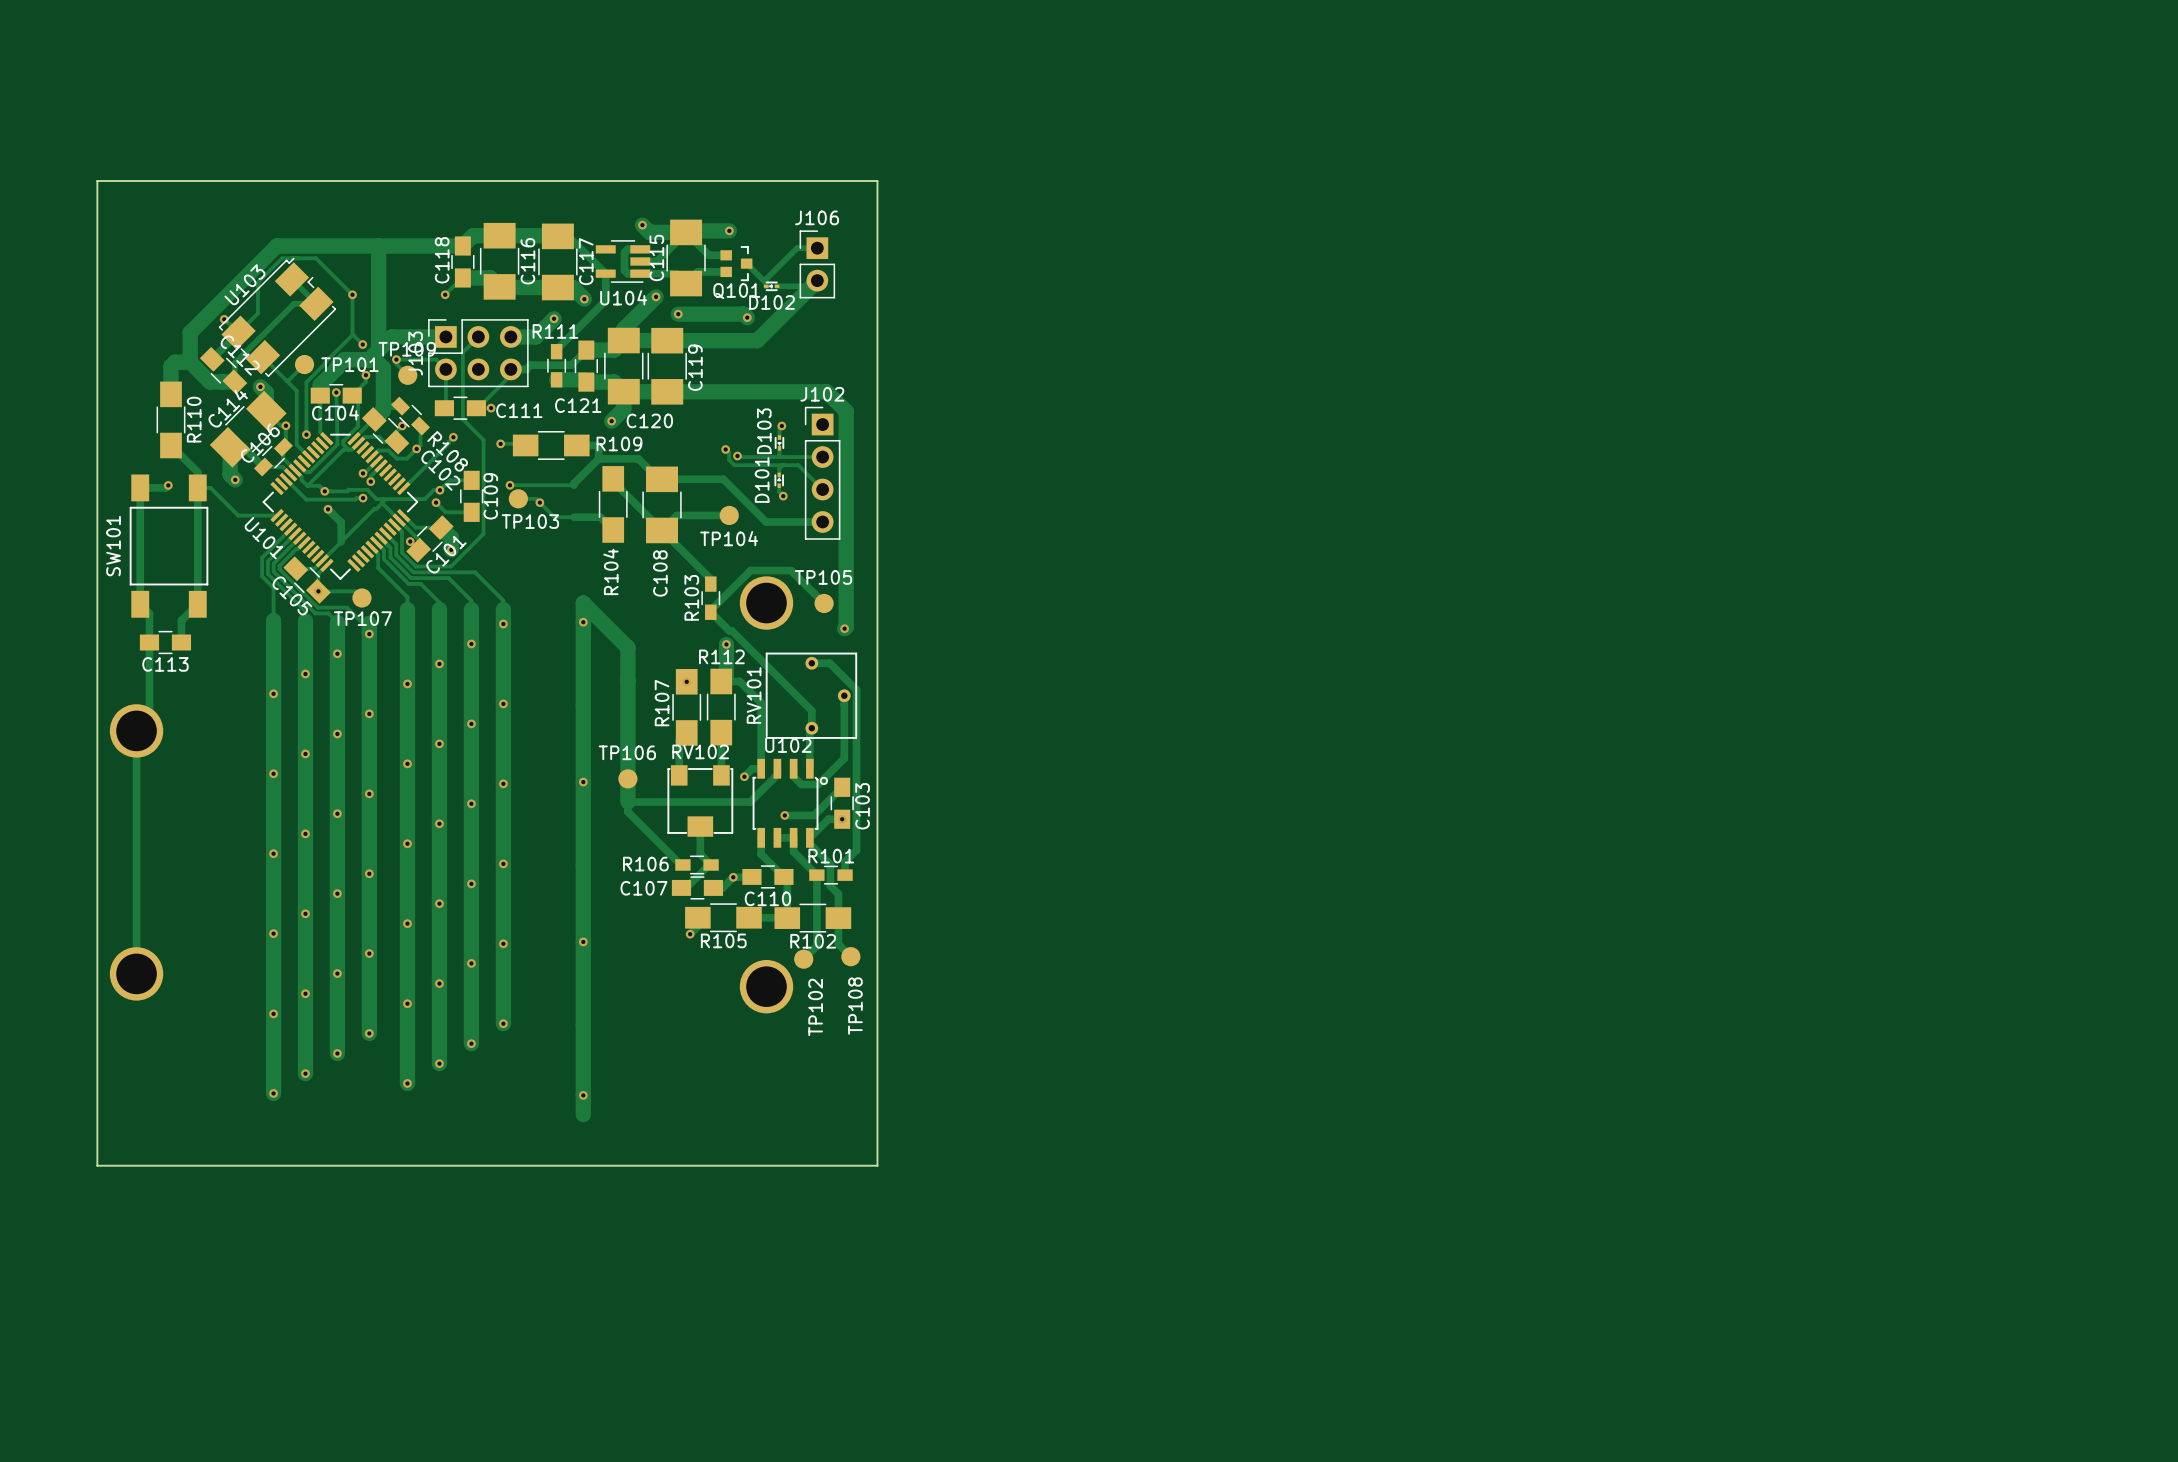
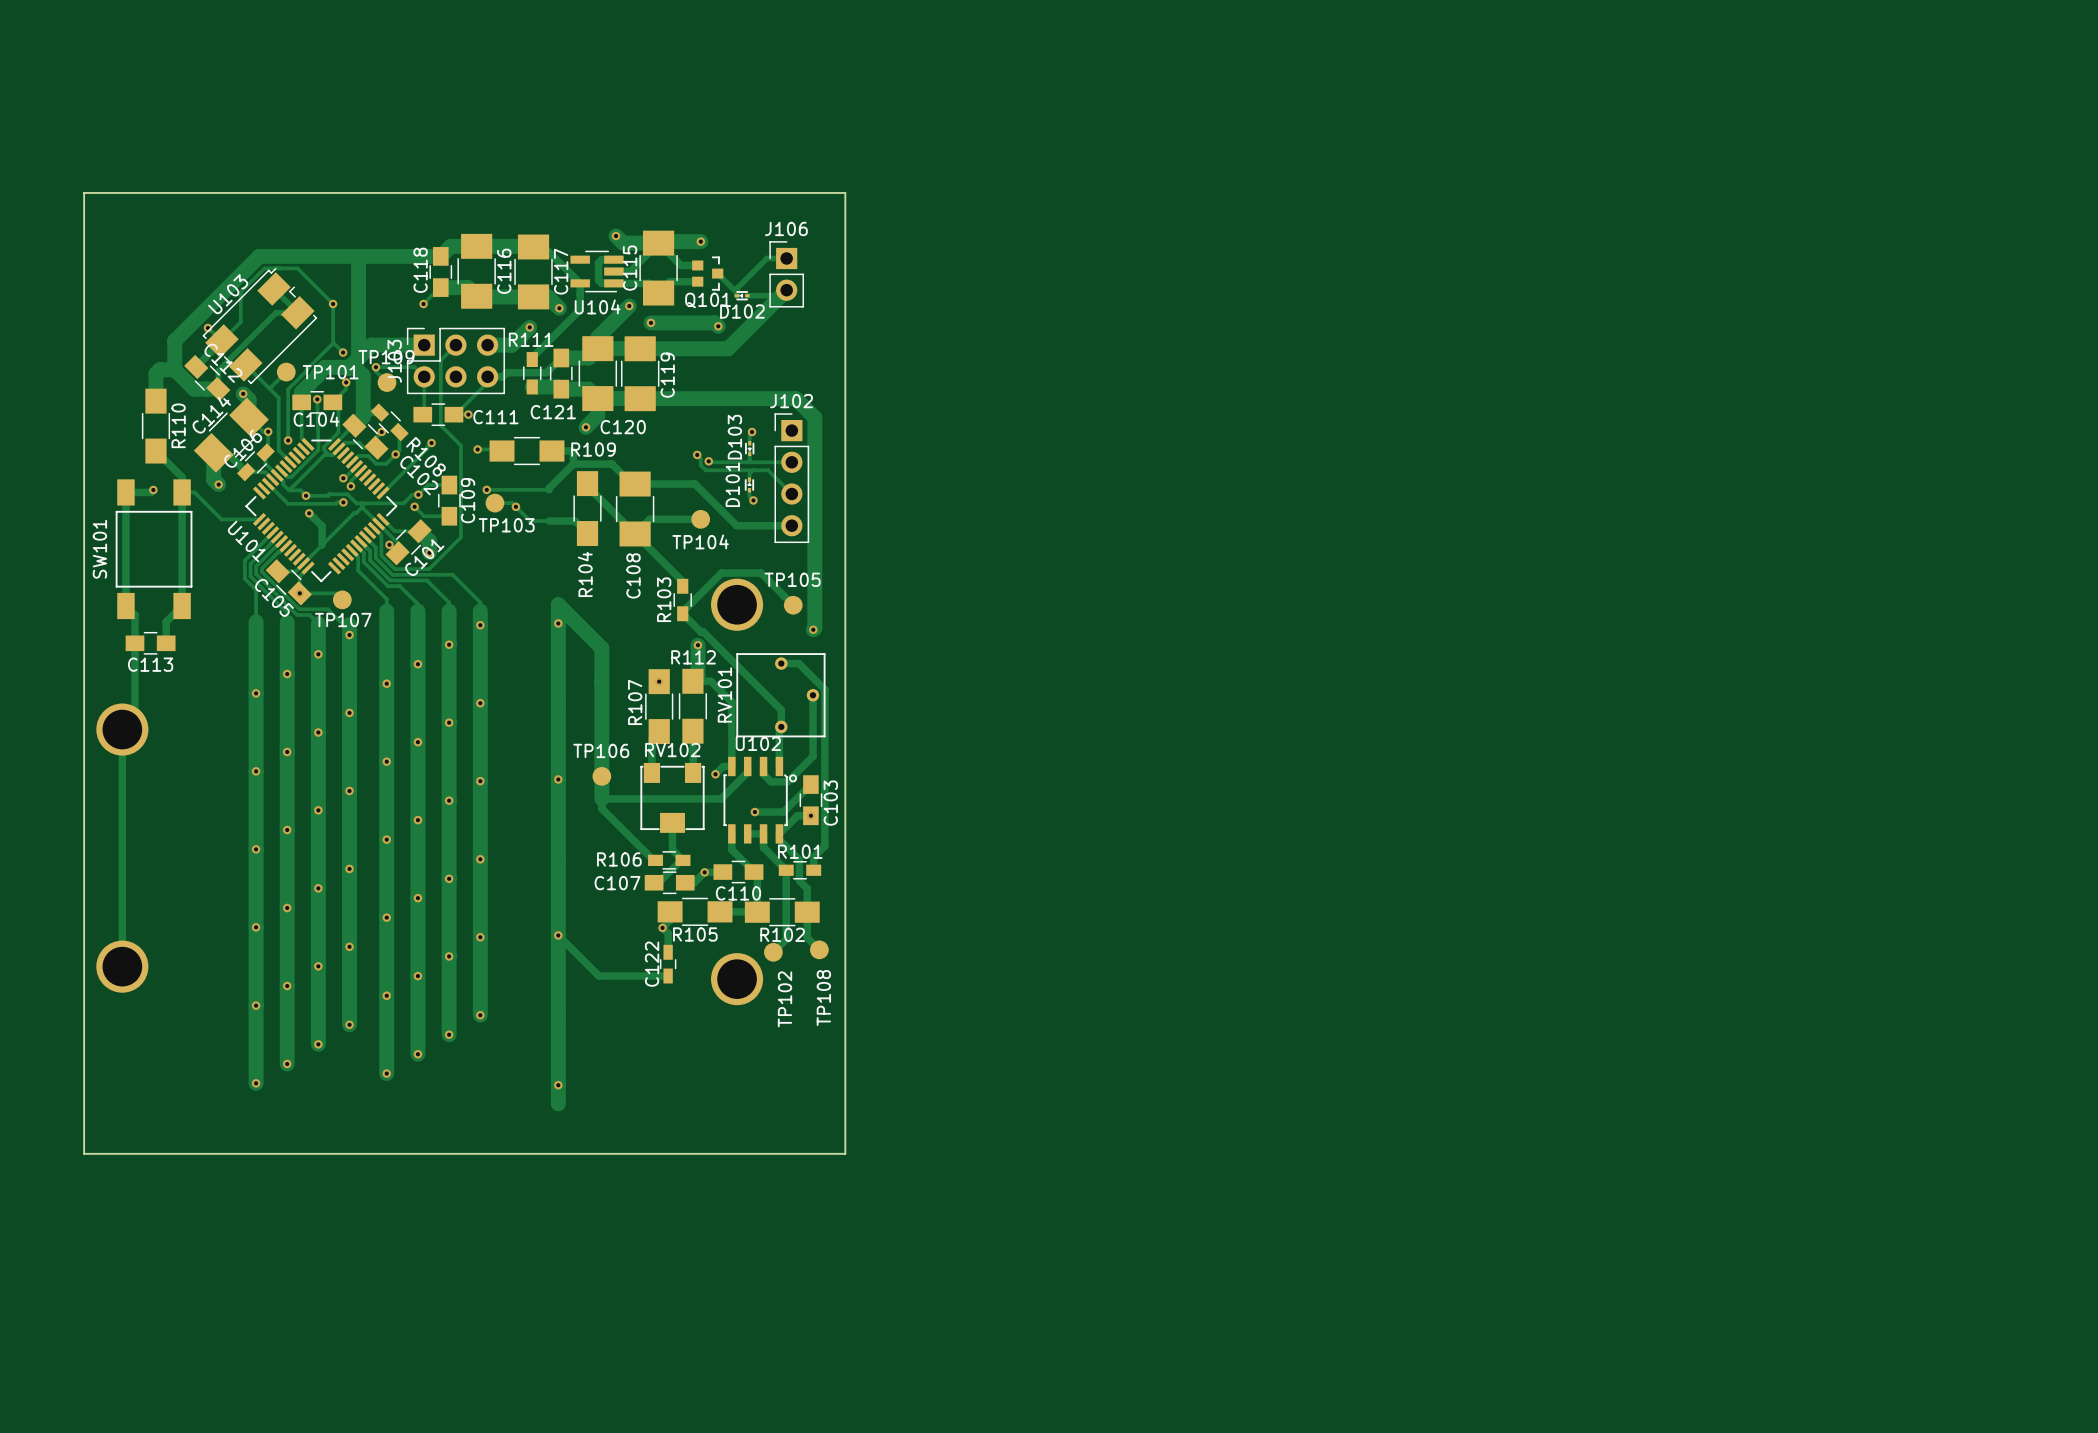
track: none -> (662, 927) (668, 933) (668, 952)
track: none -> (558, 935) (598, 976) (668, 976)
C122: none -> (668, 964)

